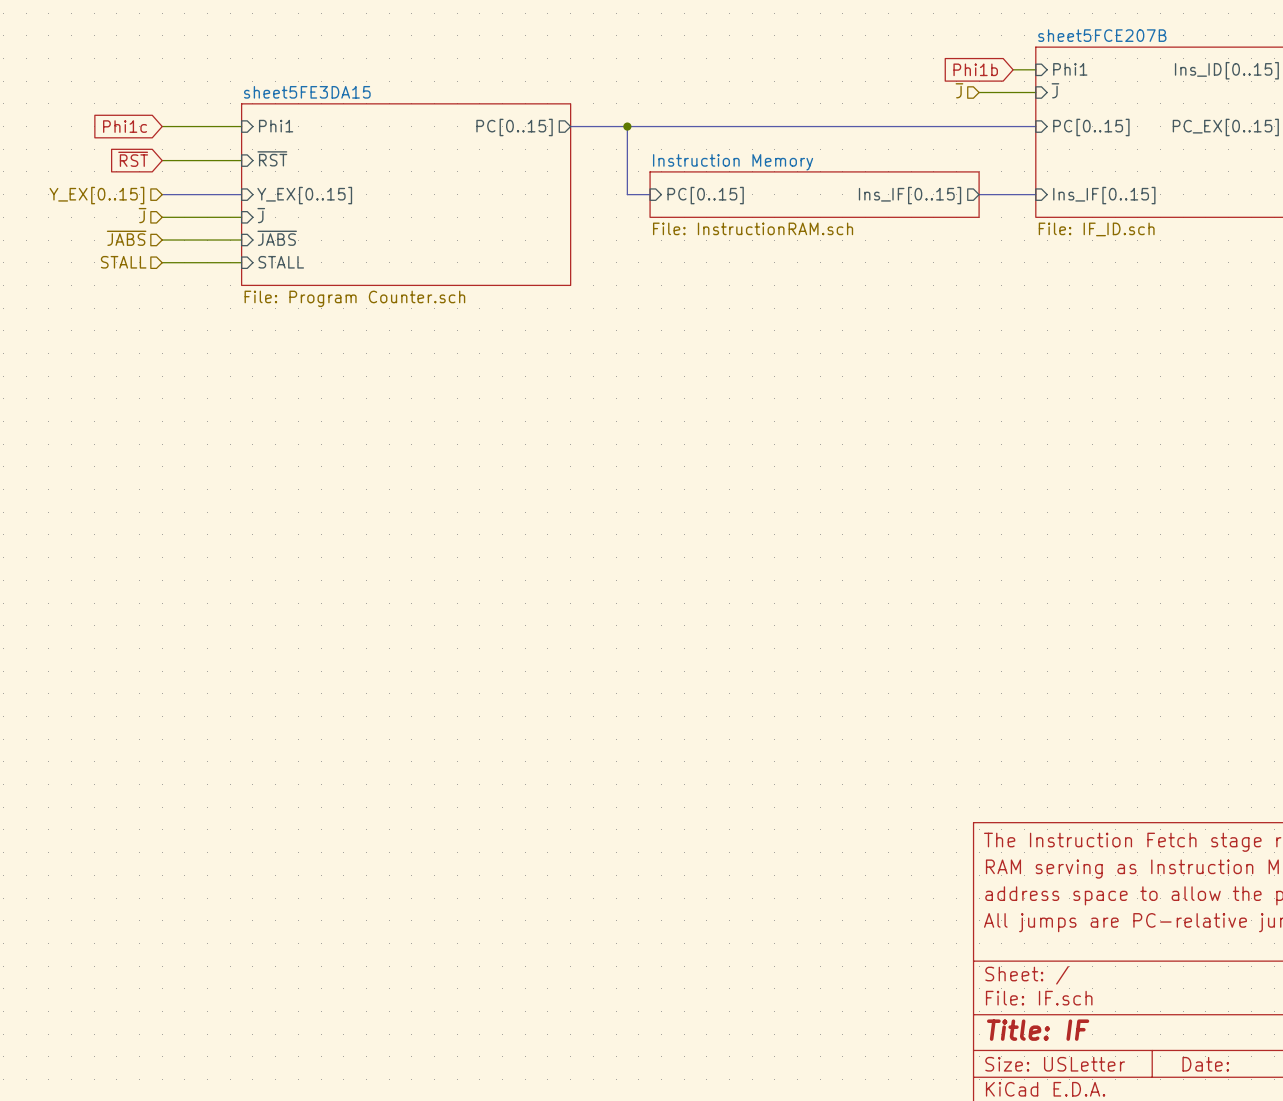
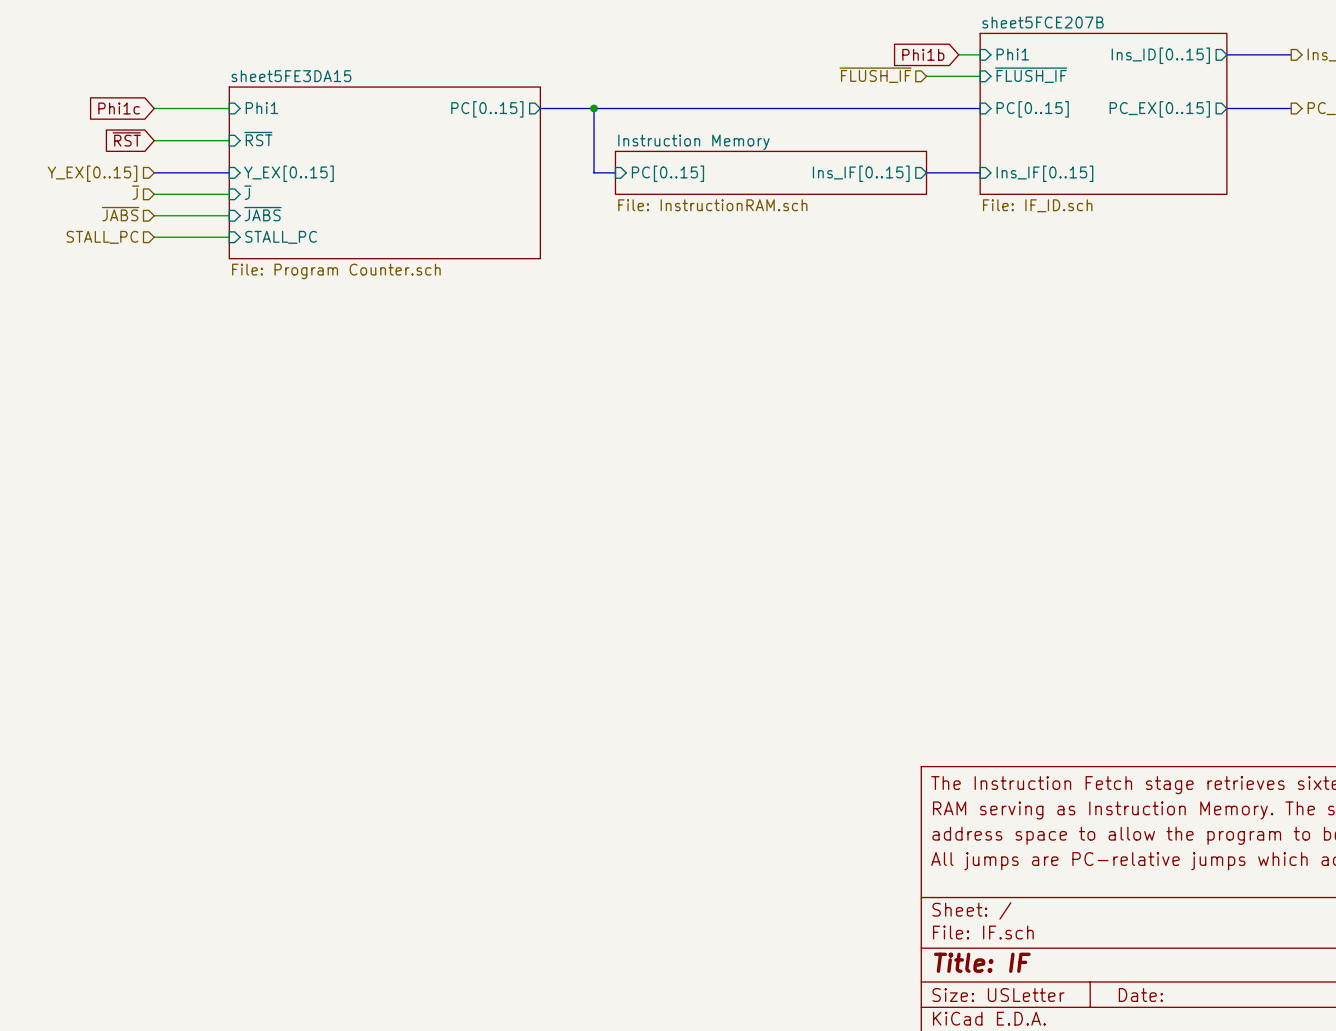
hierarchical label: ~{J} (959, 90) -> ~{FLUSH_IF} (875, 75)
sheet pin: ~{J} (1055, 90) -> ~{FLUSH_IF} (1031, 75)
hierarchical label: STALL (123, 262) -> STALL_PC (102, 237)
sheet pin: STALL (281, 262) -> STALL_PC (281, 237)

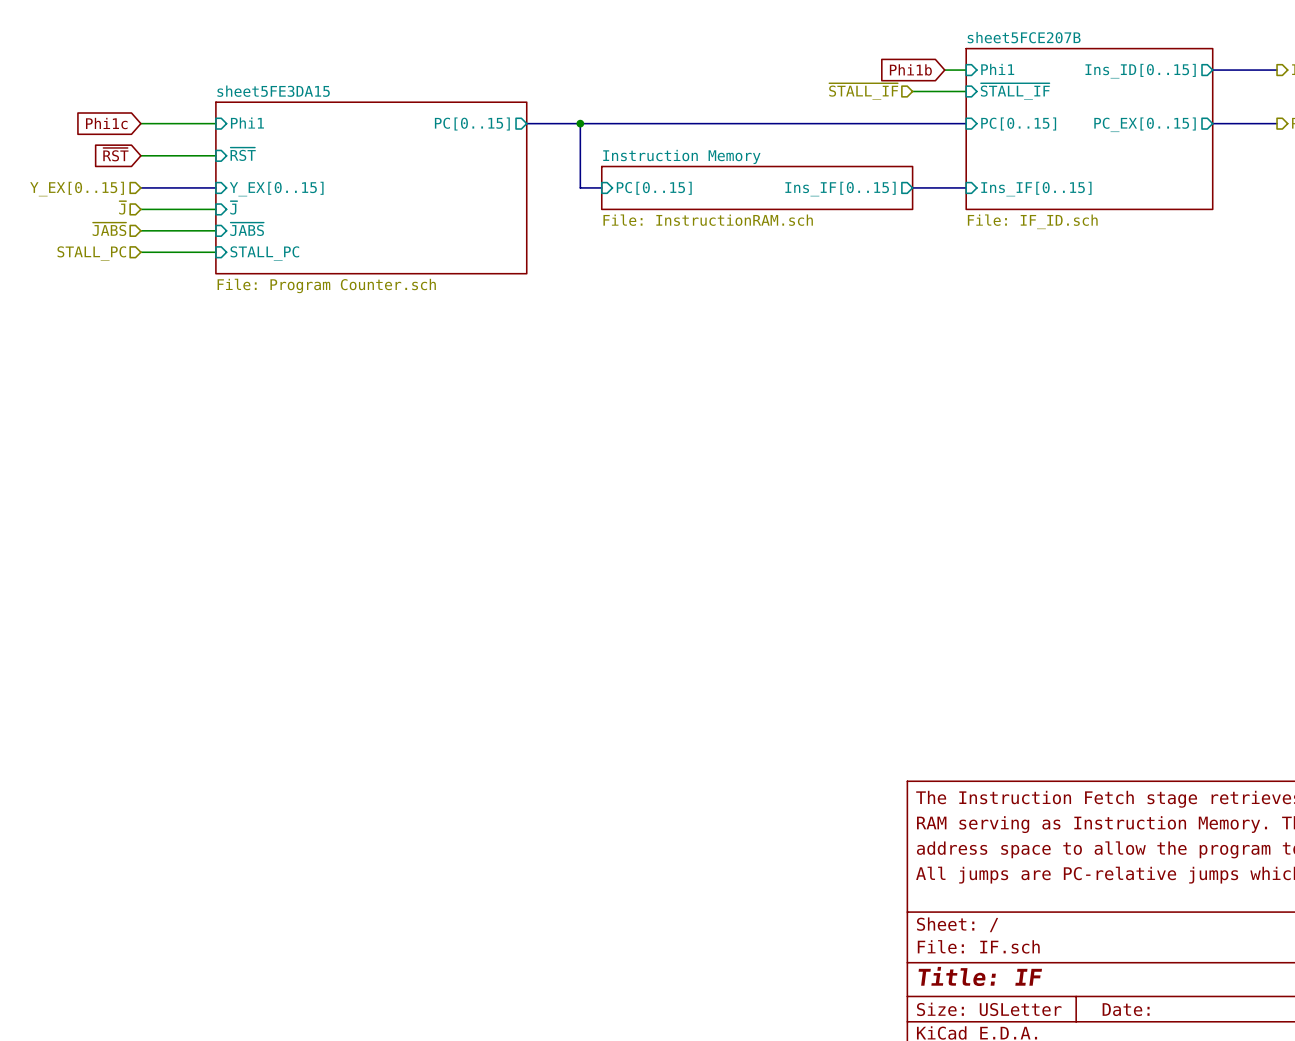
hierarchical label: ~{FLUSH_IF} (875, 75) -> ~{STALL_IF} (863, 91)
sheet pin: ~{FLUSH_IF} (1031, 75) -> ~{STALL_IF} (1015, 91)

